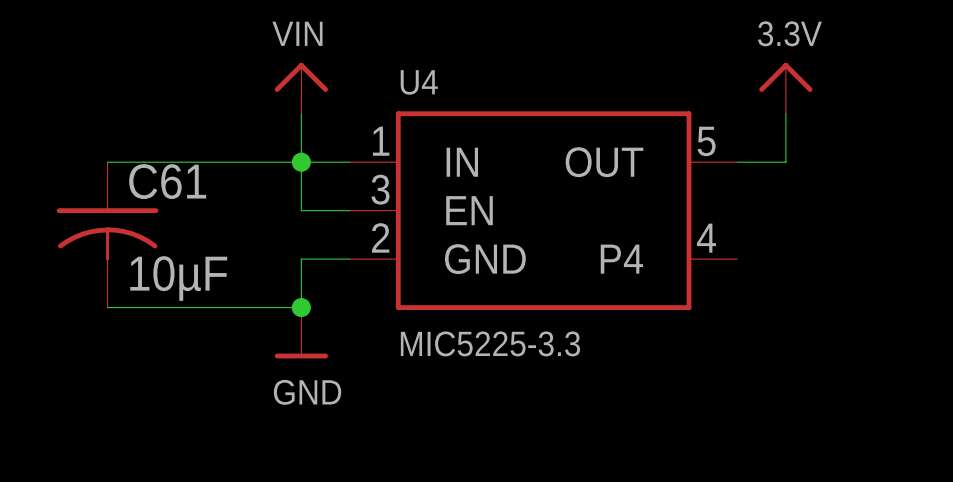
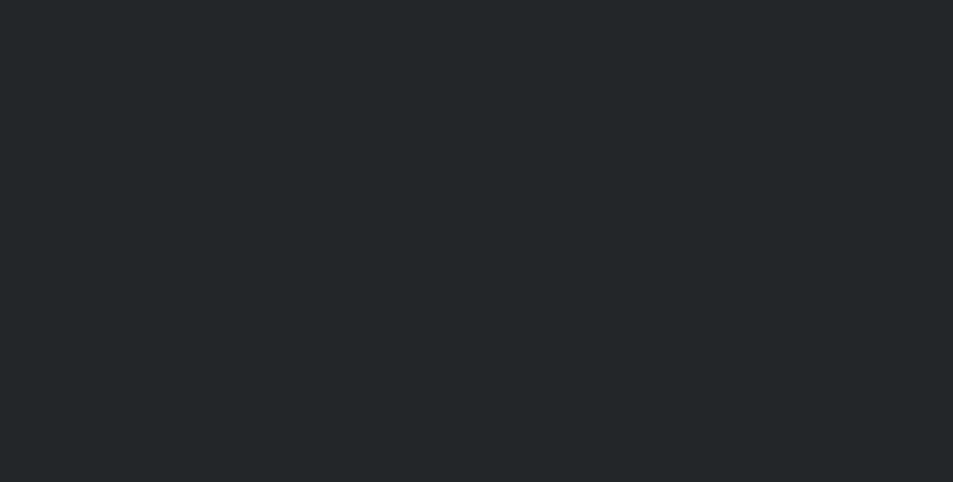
power symbol: VIN (301, 88) -> none
power symbol: 3.3V (785, 88) -> none
wire: (301, 113) (301, 210) (349, 210) -> none
wire: (785, 113) (785, 162) (737, 162) -> none
wire: (107, 162) (349, 162) -> none
junction: (301, 162) -> none
U4: MIC5225-3.3 (543, 210) -> none
C61: 10µF (107, 234) -> none
wire: (349, 259) (301, 259) (301, 307) (107, 307) -> none
junction: (301, 307) -> none
power symbol: GND (301, 333) -> none

